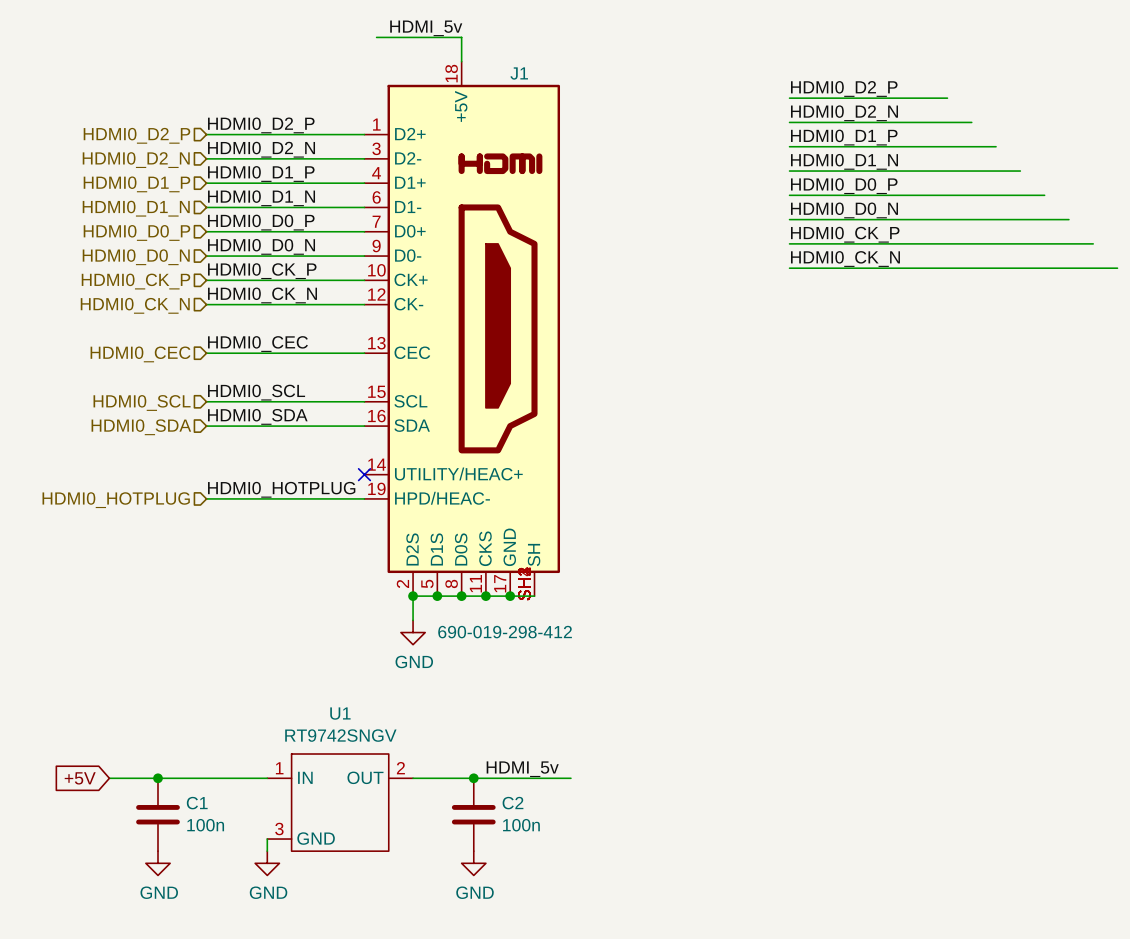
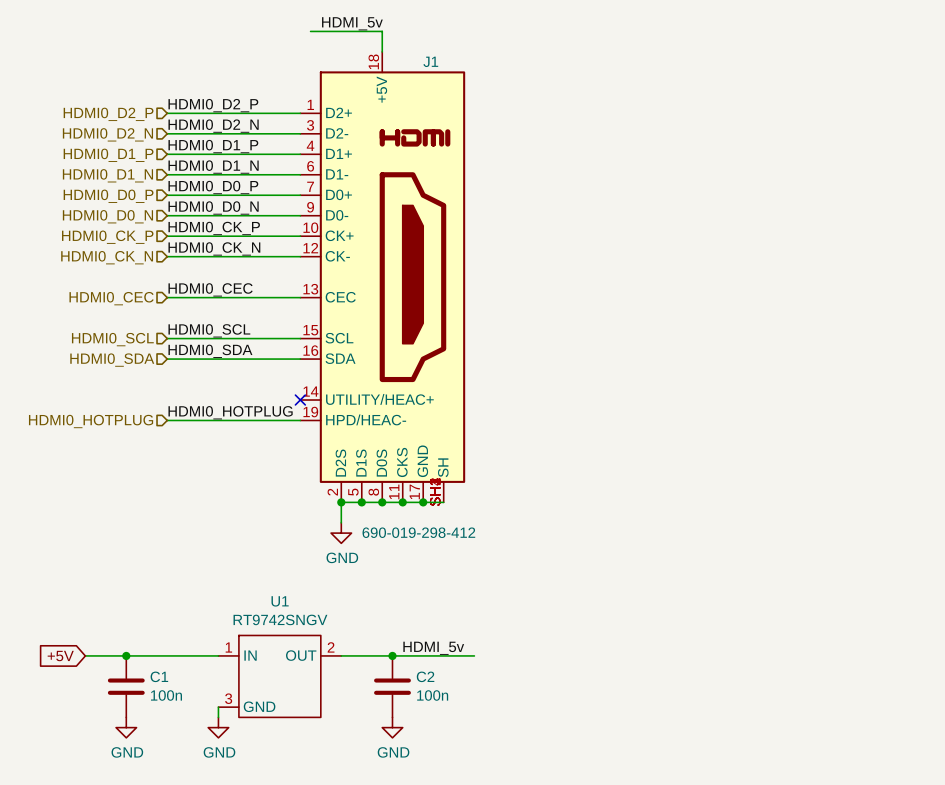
label: HDMI0_D2_P (844, 88) -> none
wire: (789, 98) (947, 98) -> none
label: HDMI0_D2_N (844, 113) -> none
wire: (789, 122) (971, 122) -> none
label: HDMI0_D1_P (844, 137) -> none
wire: (789, 146) (996, 146) -> none
label: HDMI0_D1_N (844, 161) -> none
wire: (789, 171) (1020, 171) -> none
label: HDMI0_D0_P (844, 186) -> none
wire: (789, 195) (1044, 195) -> none
label: HDMI0_D0_N (844, 210) -> none
wire: (789, 219) (1068, 219) -> none
label: HDMI0_CK_P (845, 234) -> none
wire: (789, 243) (1093, 243) -> none
label: HDMI0_CK_N (845, 259) -> none
wire: (789, 268) (1117, 268) -> none

